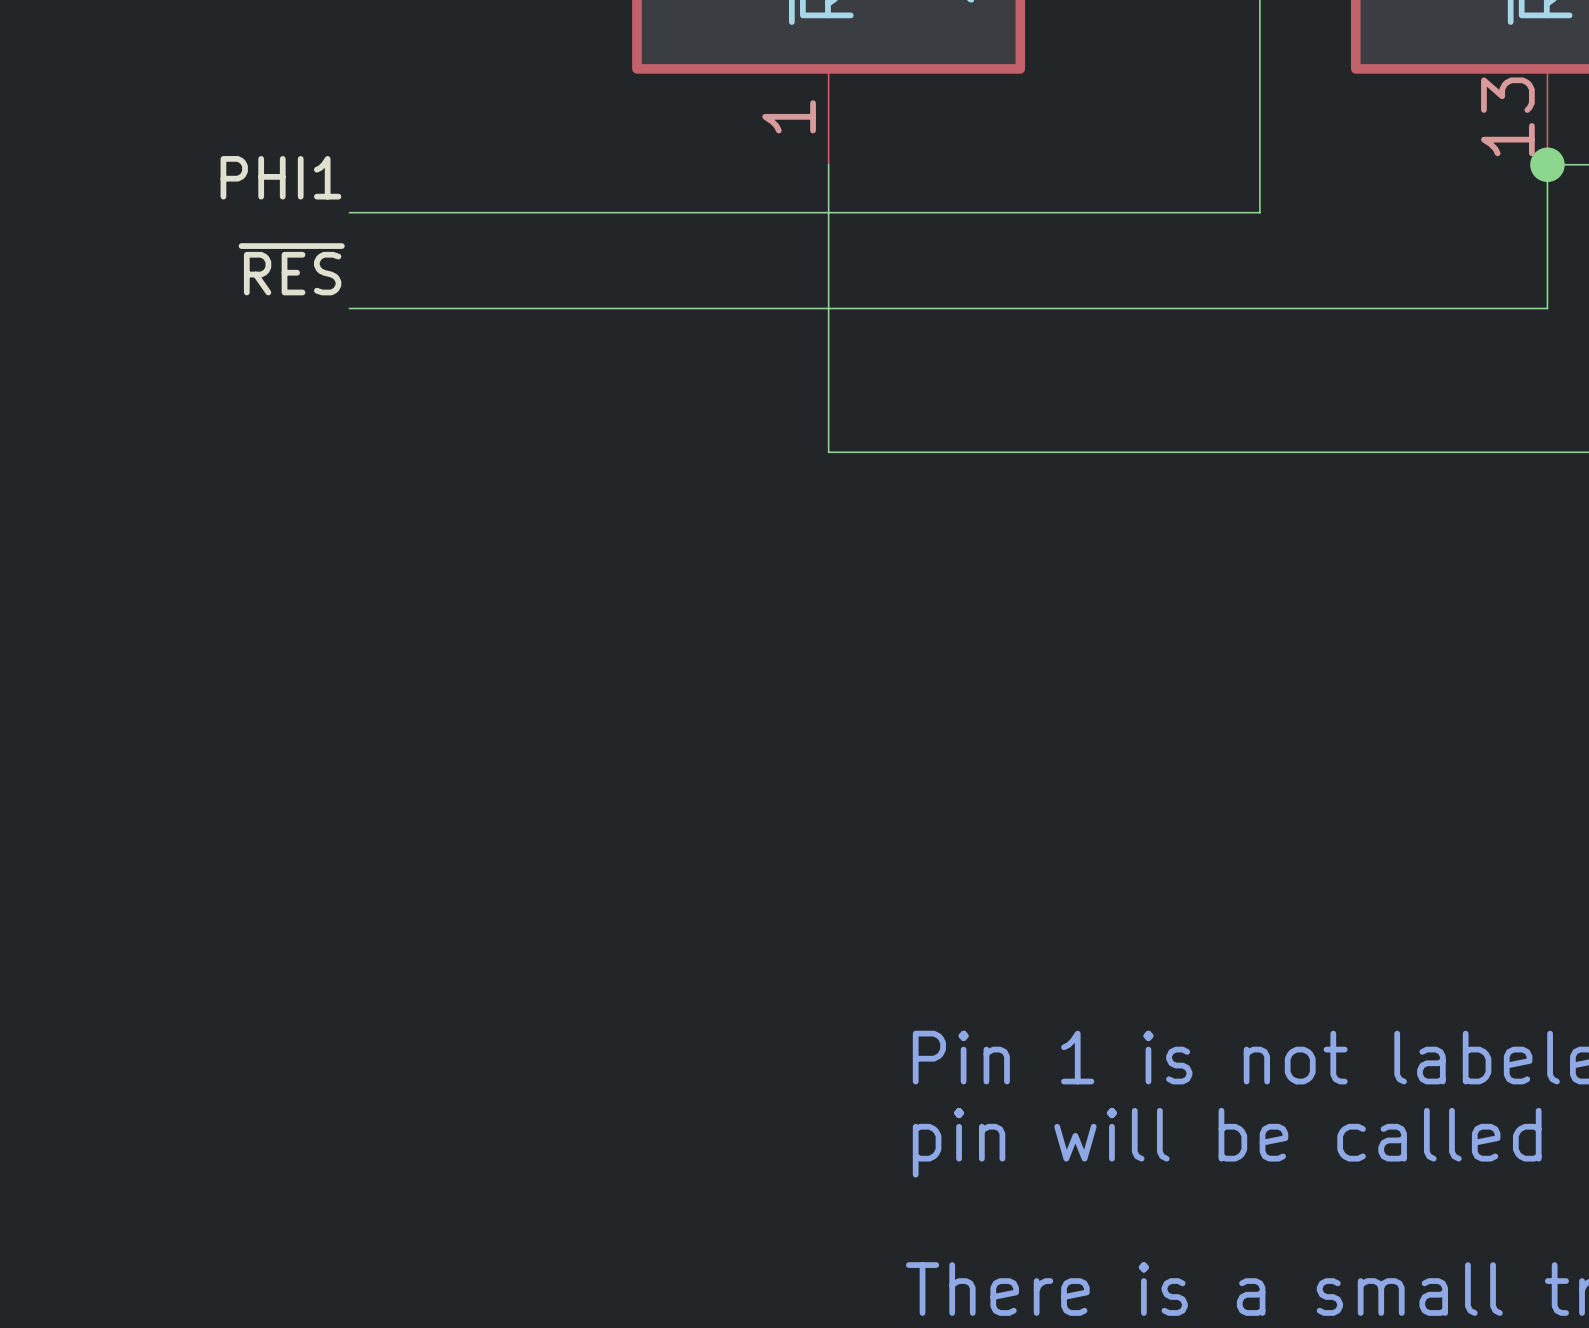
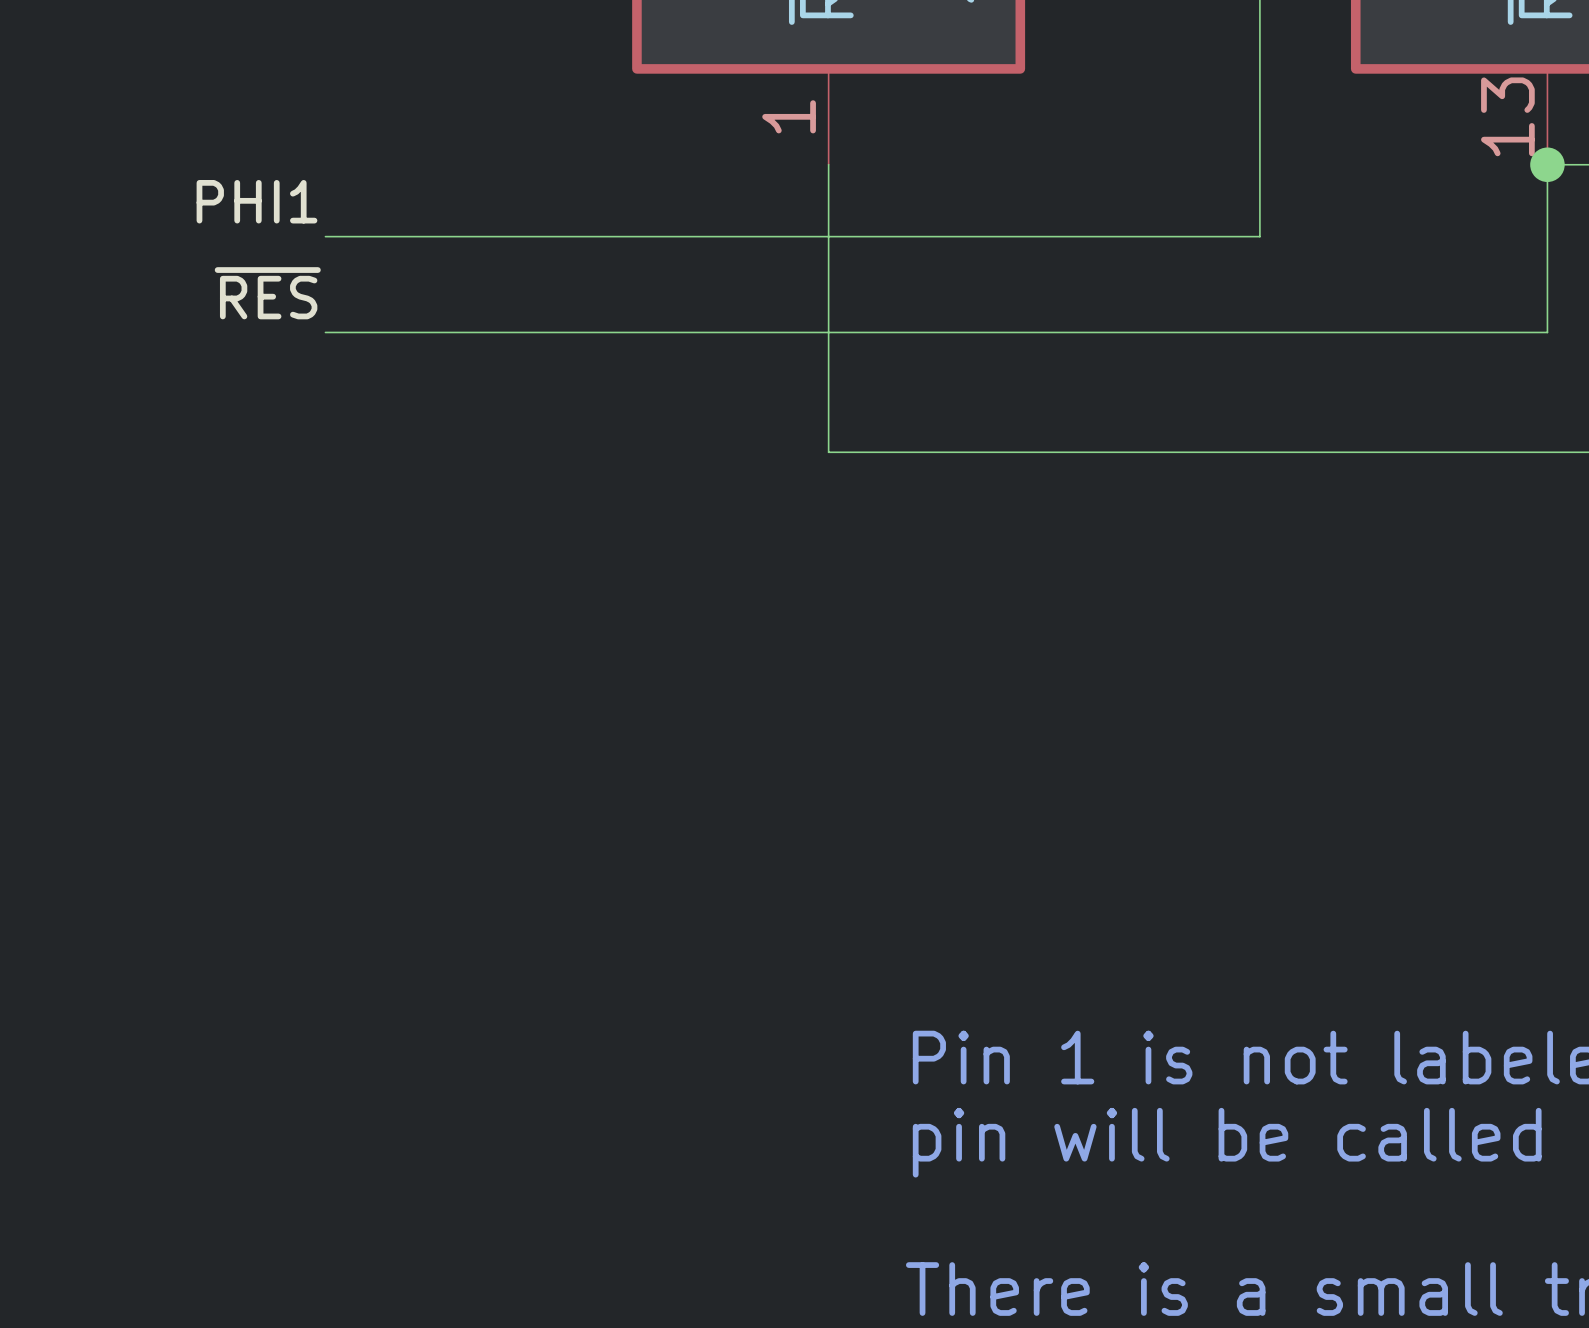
label position: PHI1 (280, 177) -> PHI1 (256, 201)
wire: (349, 212) (1259, 212) -> (325, 236) (1259, 236) (1259, 212)
label position: ~{RES} (291, 269) -> ~{RES} (267, 293)
wire: (349, 308) (1547, 308) -> (325, 332) (1547, 332) (1547, 308)

